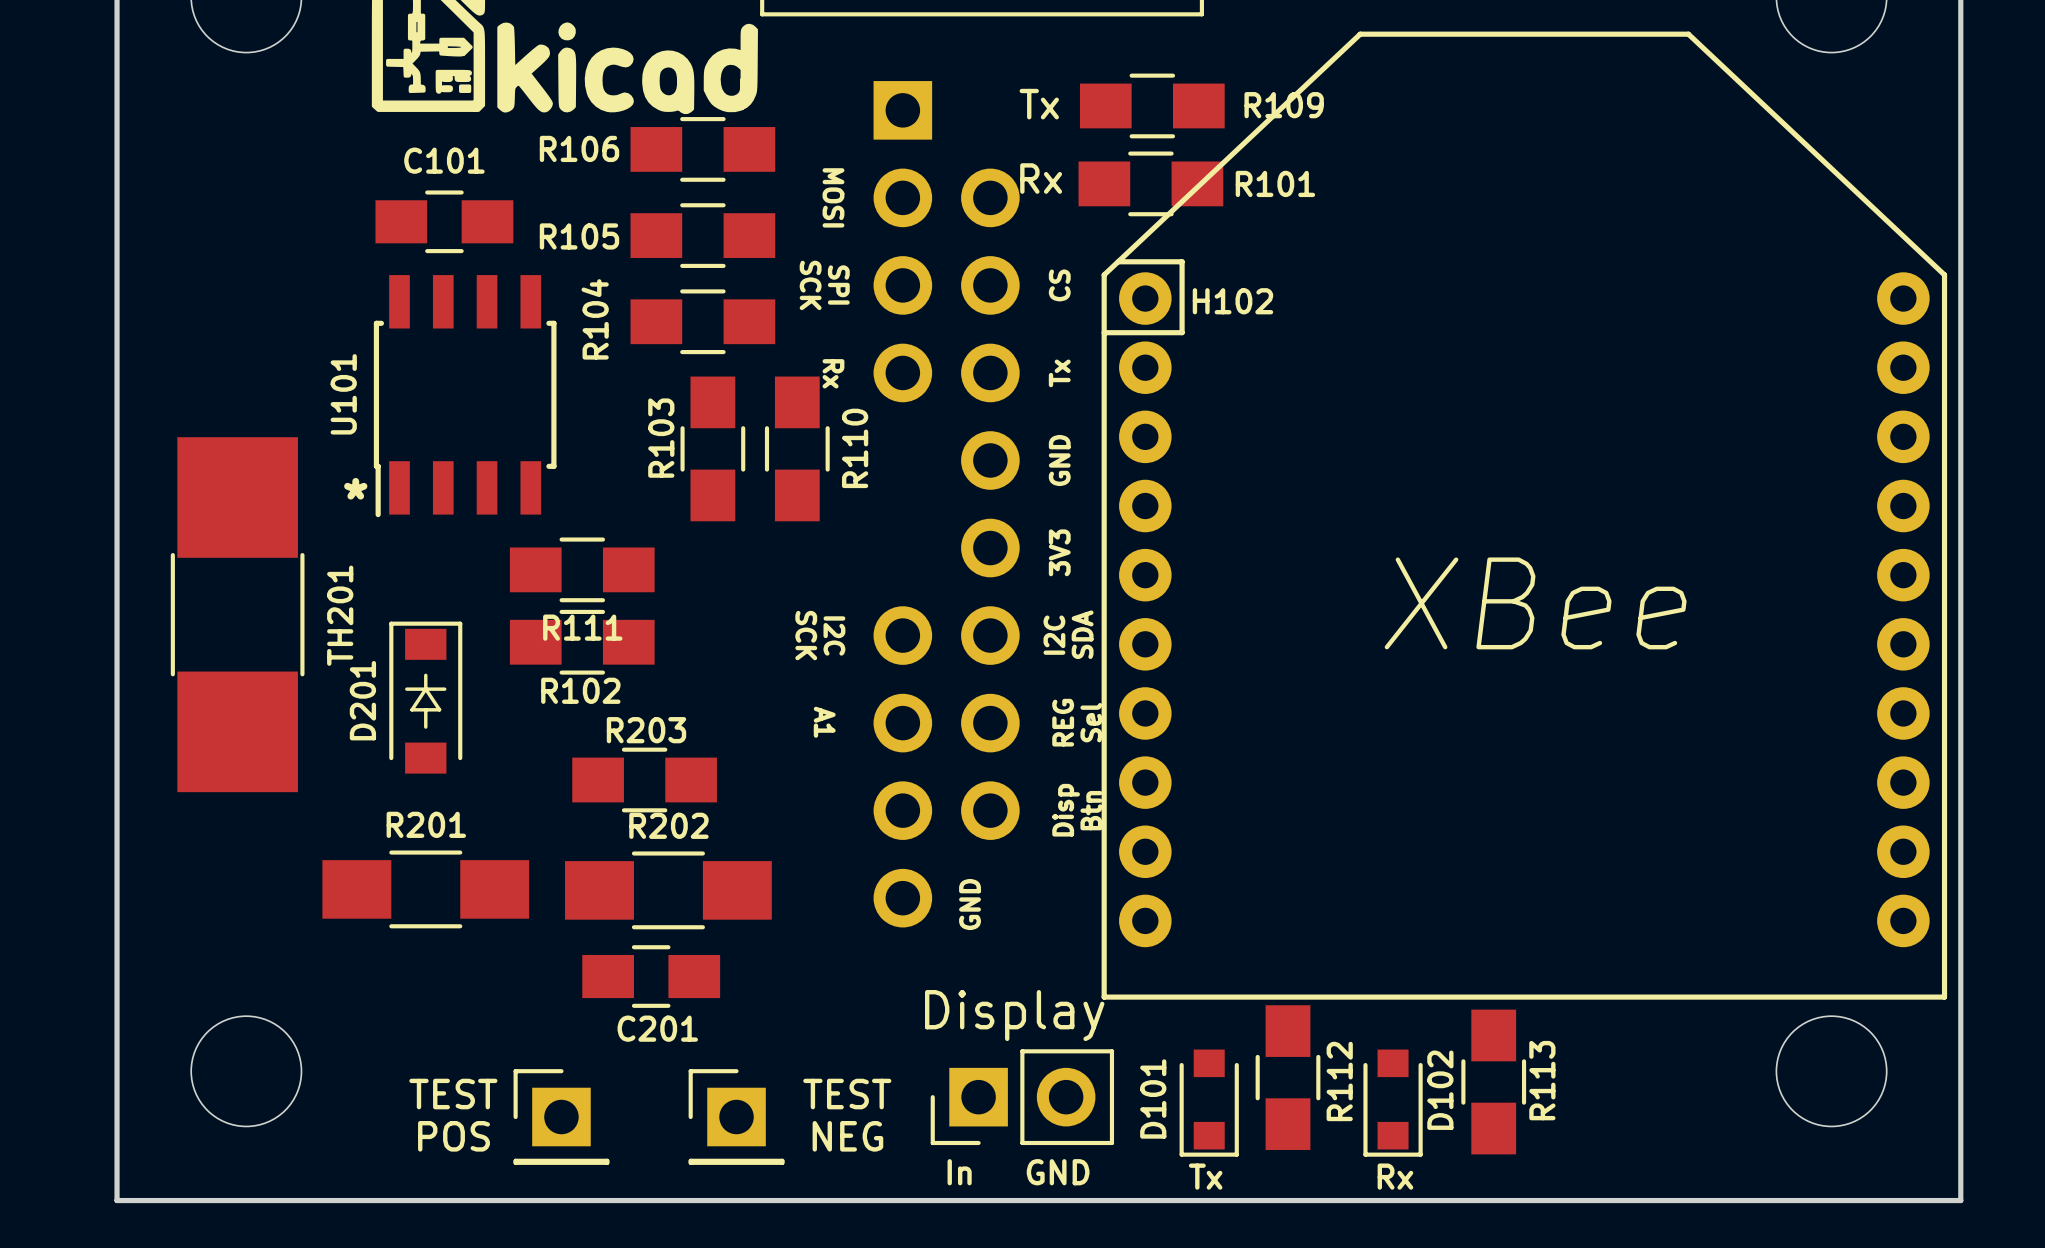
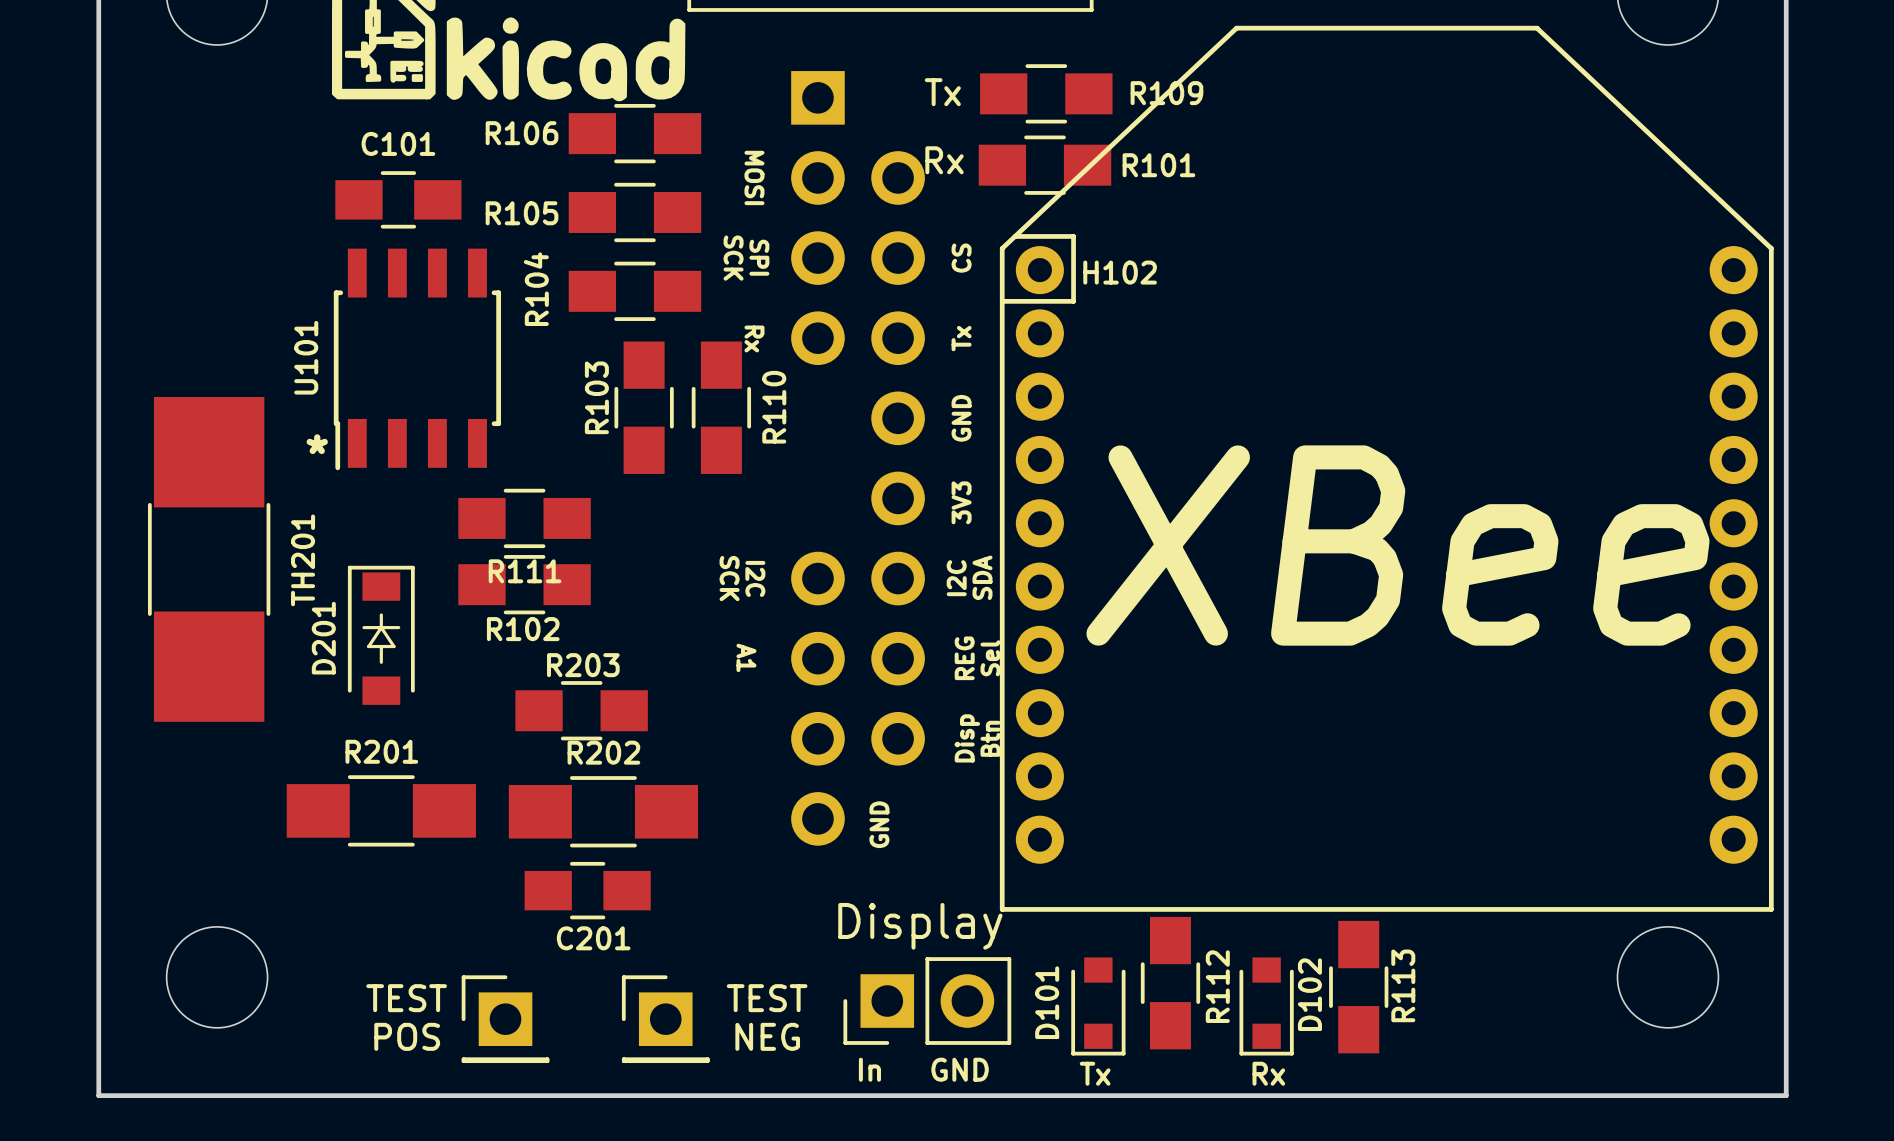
H102 footprint: [1101, 31, 1948, 1000] -> [999, 25, 1774, 912]

